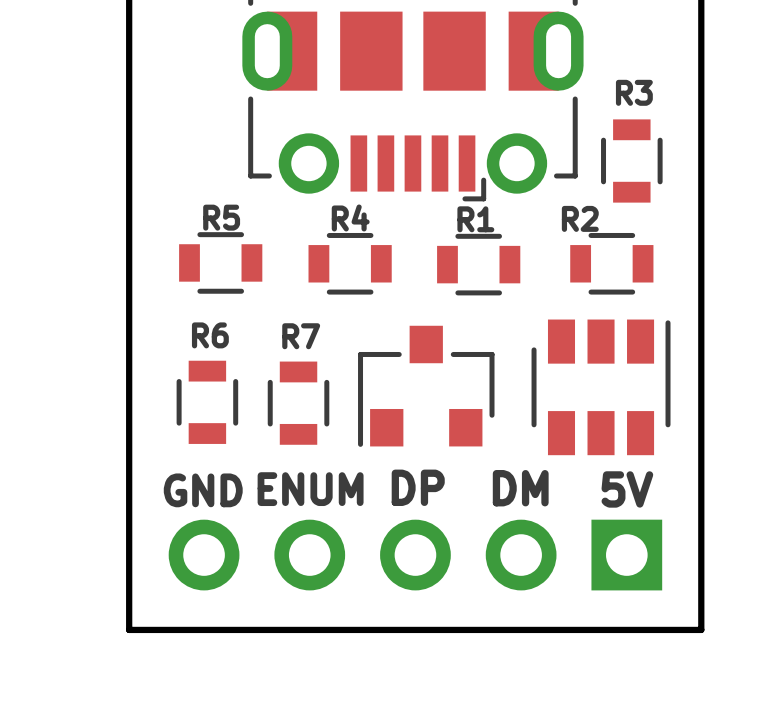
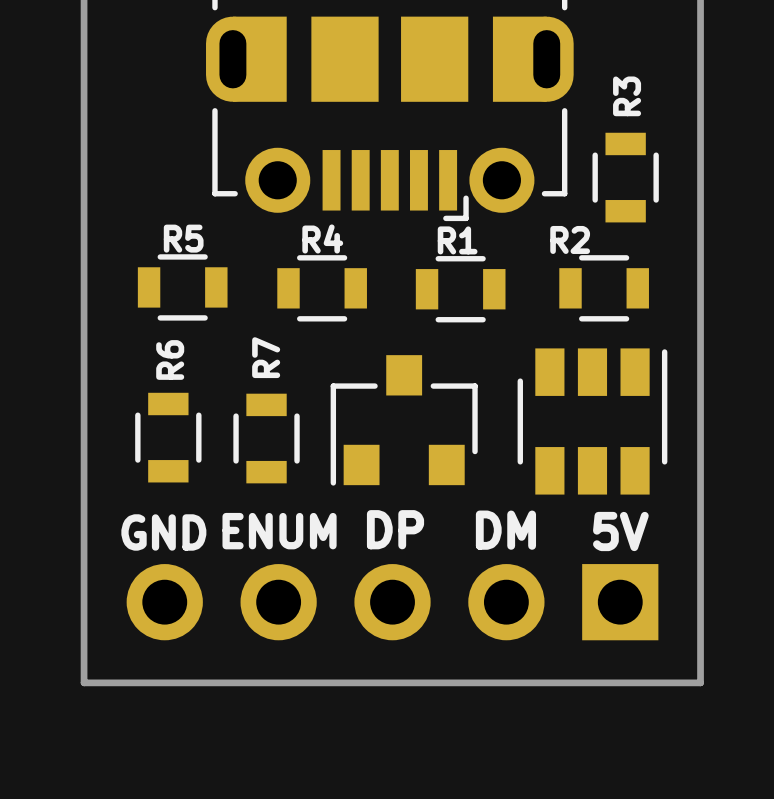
R3 name rotation: 0° (634, 92) -> 90° counterclockwise (627, 96)
R6 name rotation: 0° (210, 335) -> 90° counterclockwise (170, 359)
R7 name rotation: 0° (301, 336) -> 90° counterclockwise (266, 357)

